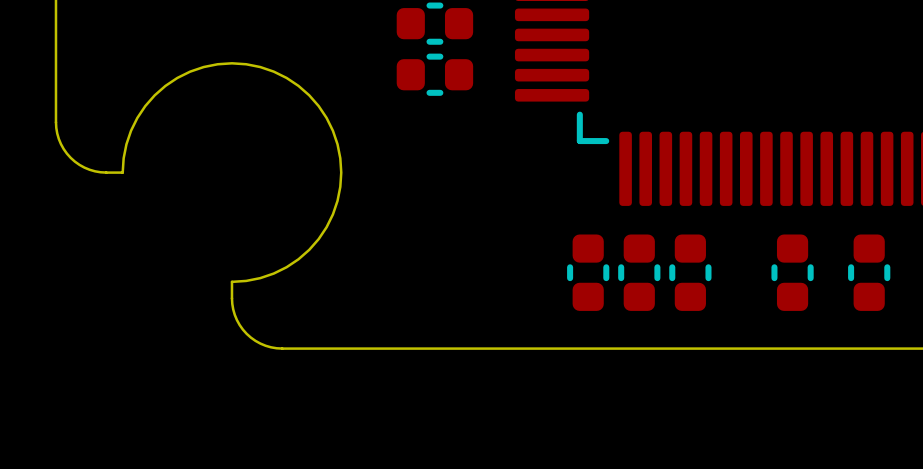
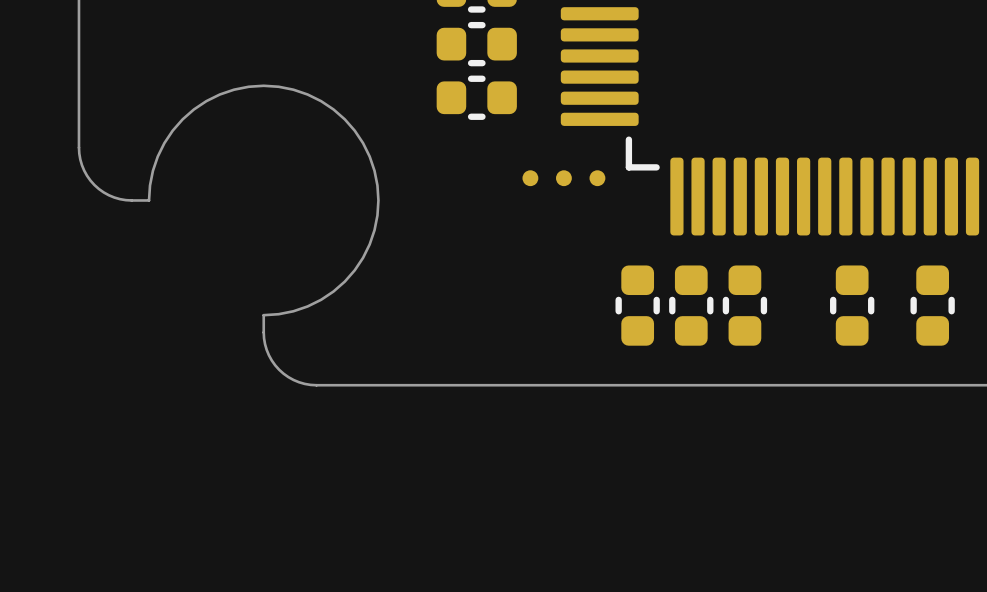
part: none -> (530, 178)
part: none -> (563, 178)
part: none -> (597, 178)

